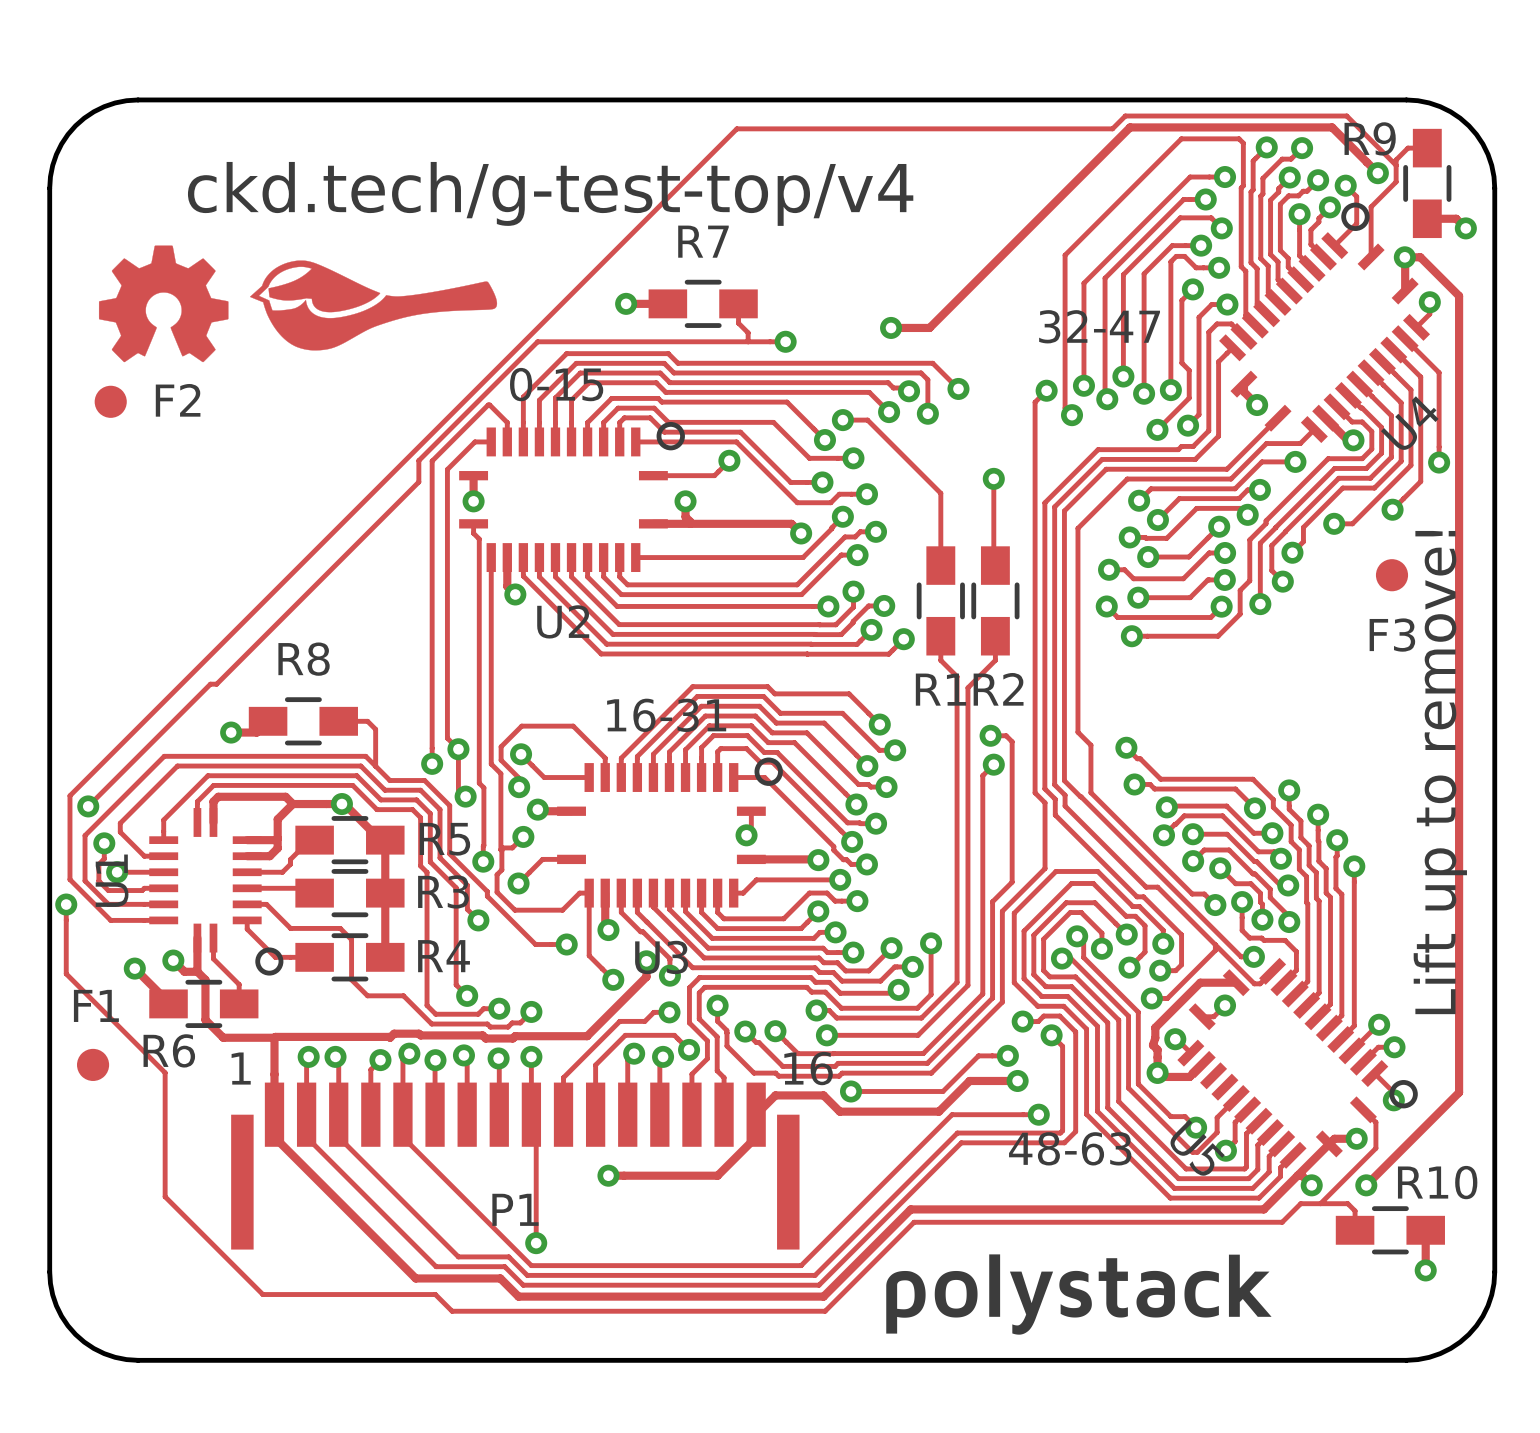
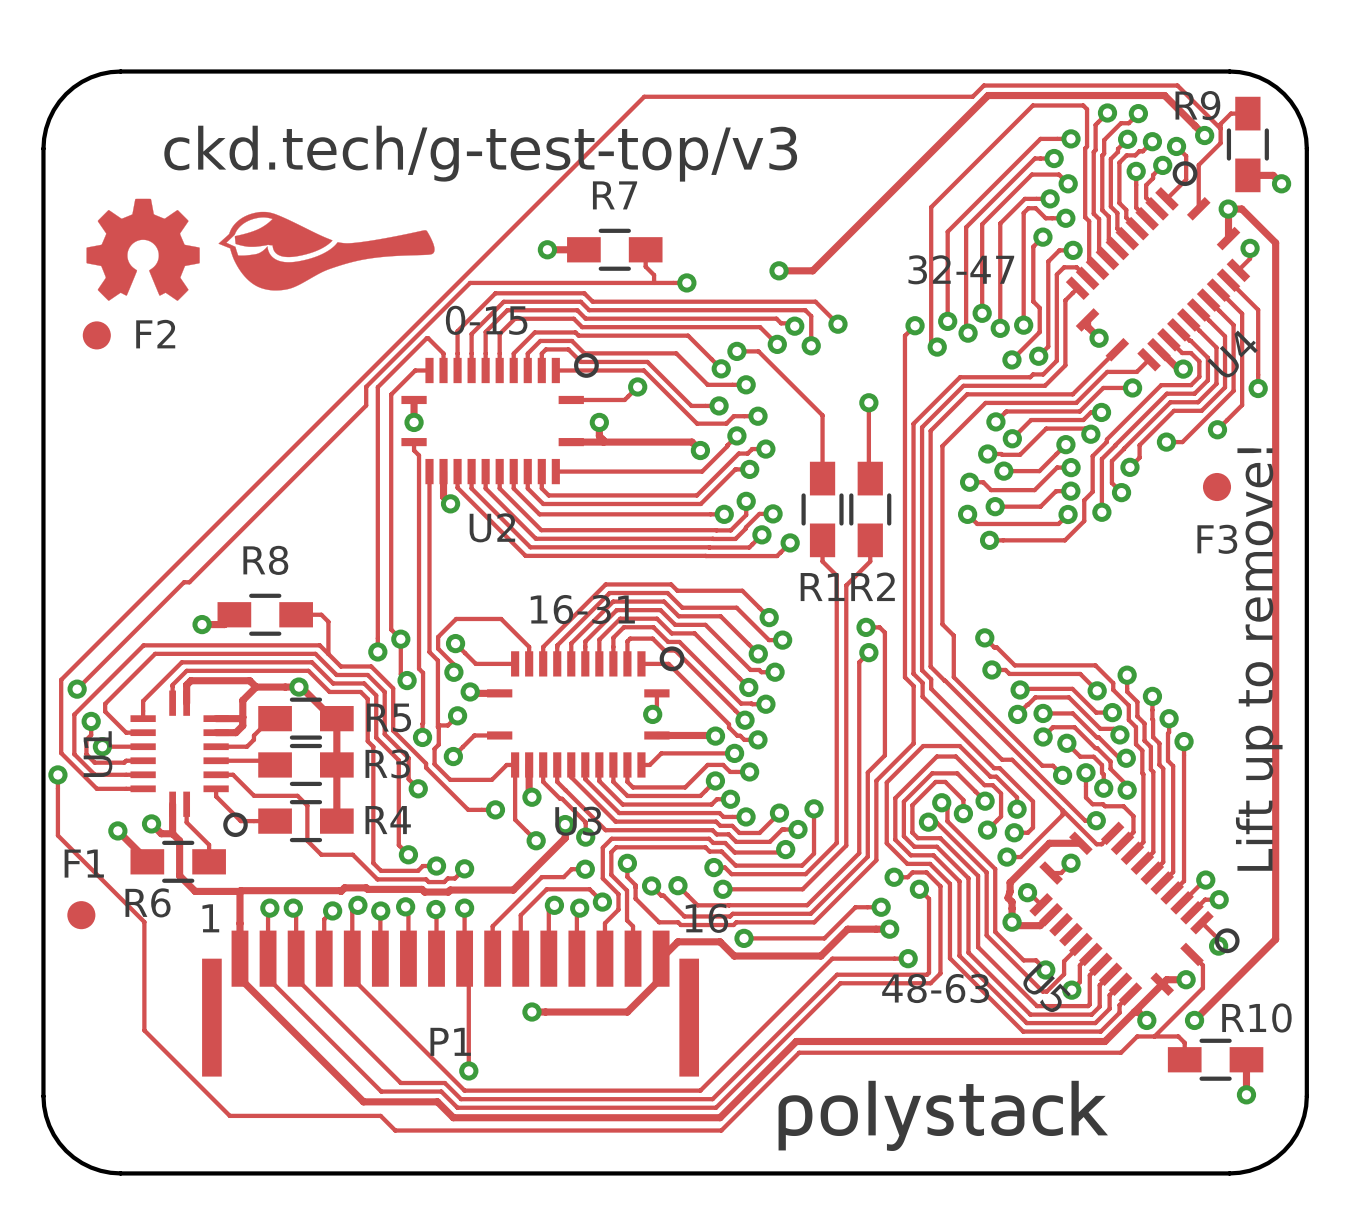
text: ckd.tech/g-test-top/v4 (550, 193) -> ckd.tech/g-test-top/v3 (480, 153)
drawing shape: [886, 1254, 1272, 1335] -> [778, 1080, 1108, 1151]

